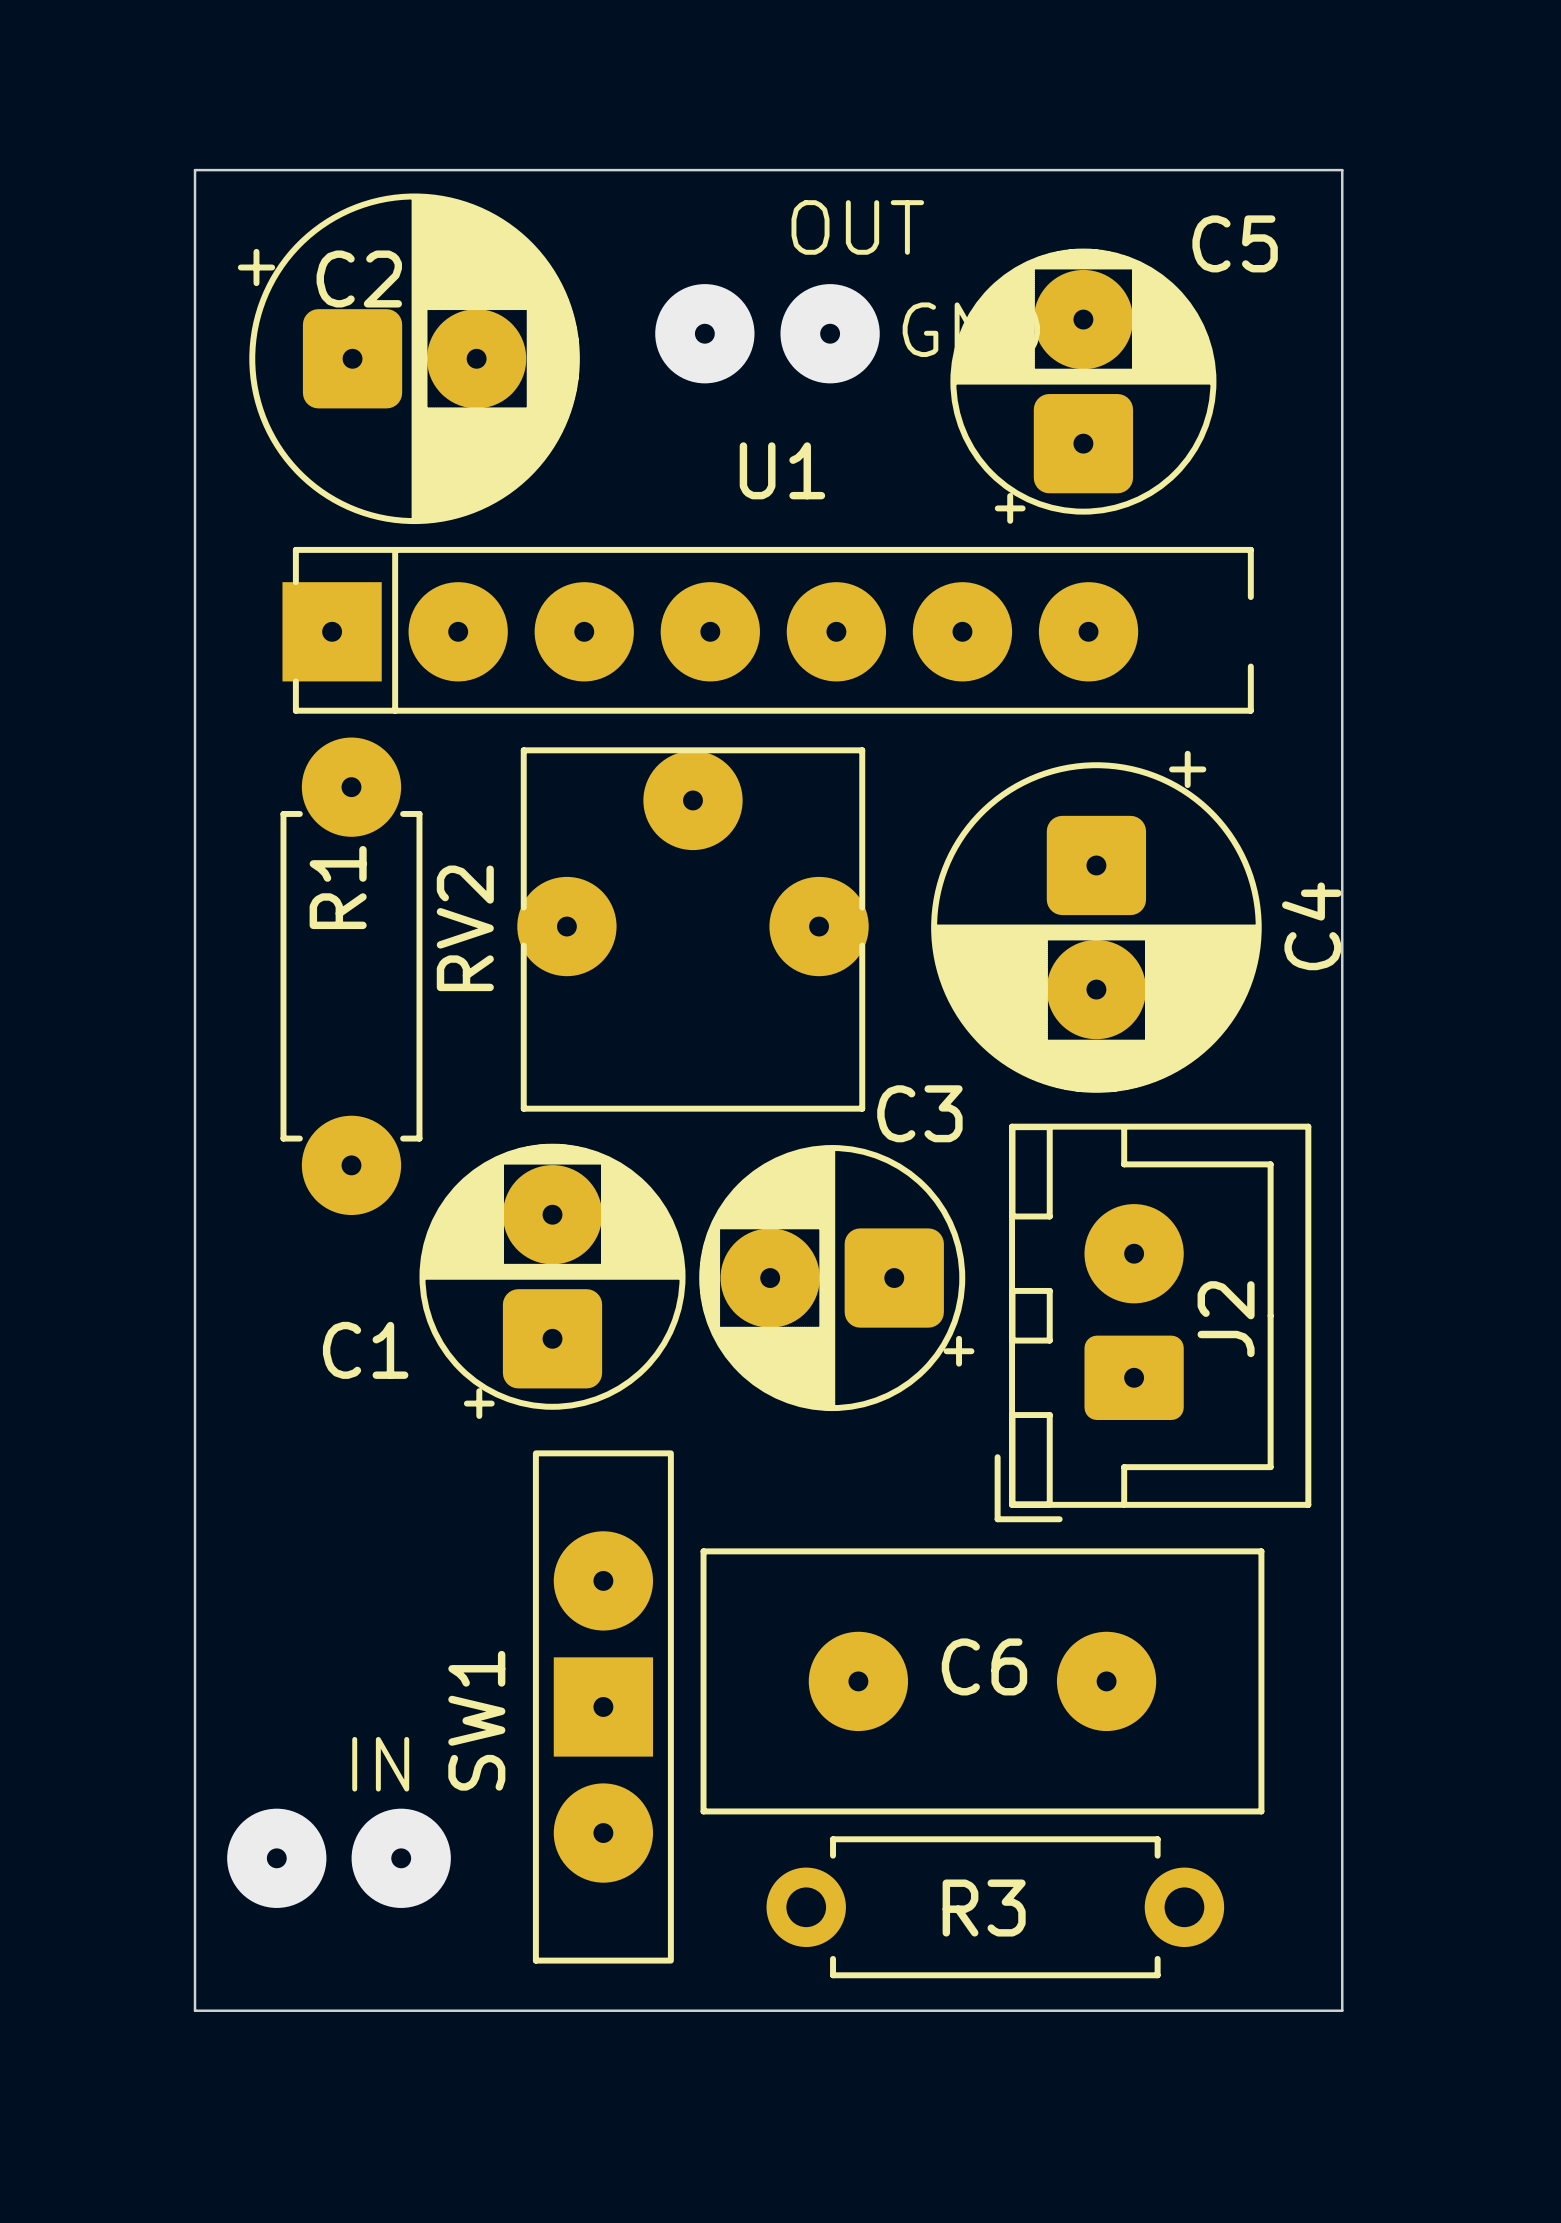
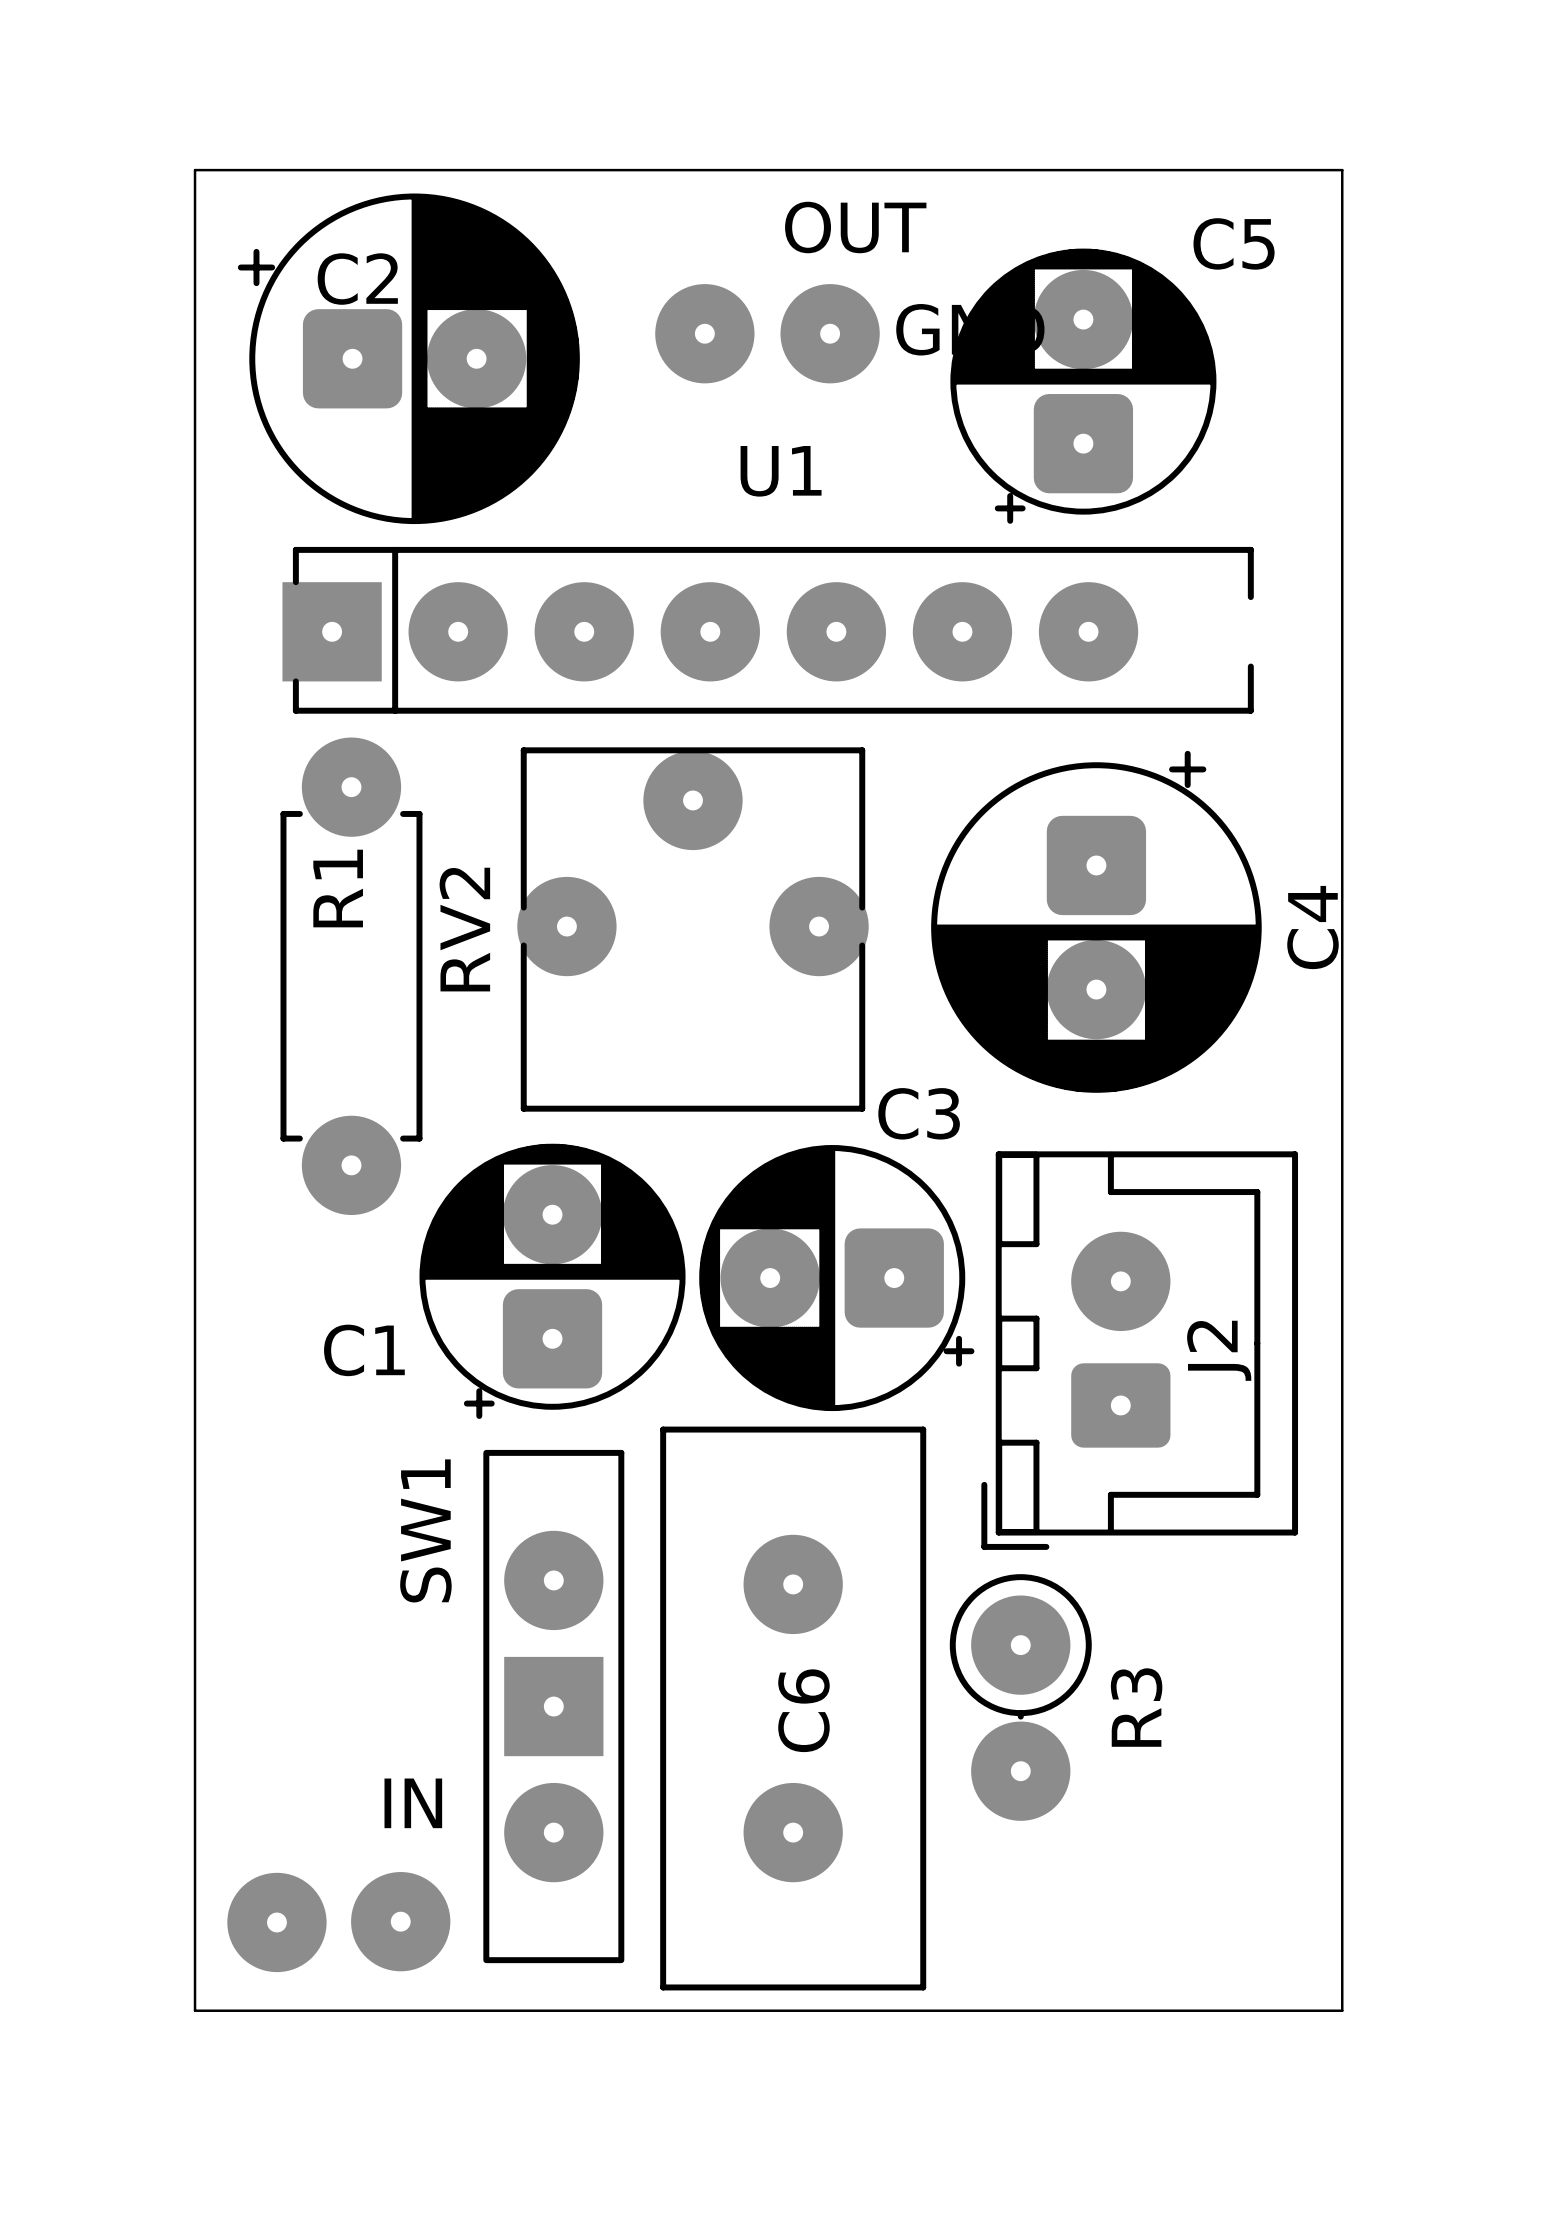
J2 position: (1152, 1322) -> (1139, 1350)
C6 rotation: 0° (982, 1681) -> 90° clockwise (793, 1708)
SW1 position: (603, 1706) -> (553, 1706)
SW1 name position: SW1 (476, 1720) -> SW1 (425, 1530)
text position: IN (380, 1764) -> IN (413, 1803)
R3 footprint: [766, 1836, 1225, 1979] -> [949, 1574, 1092, 1821]
via position: (276, 1858) -> (276, 1922)
via position: (401, 1858) -> (400, 1921)
R3 name position: R3 (984, 1908) -> R3 (1136, 1707)

